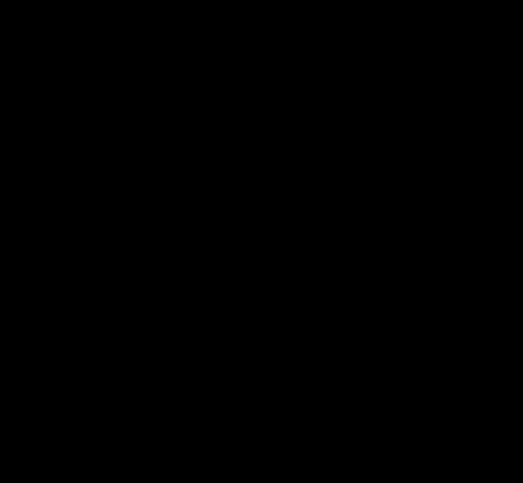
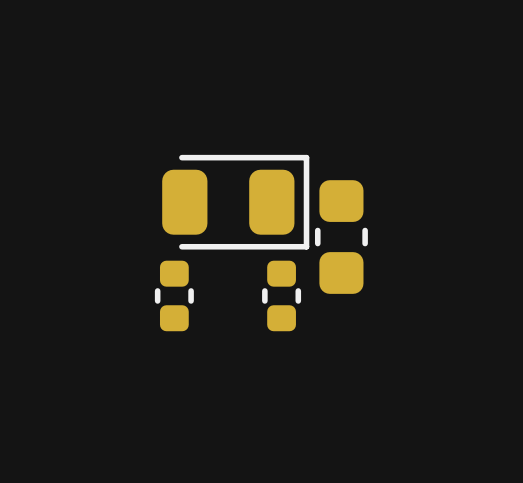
part: none -> (235, 202)
part: none -> (341, 237)
part: none -> (174, 295)
part: none -> (281, 295)

